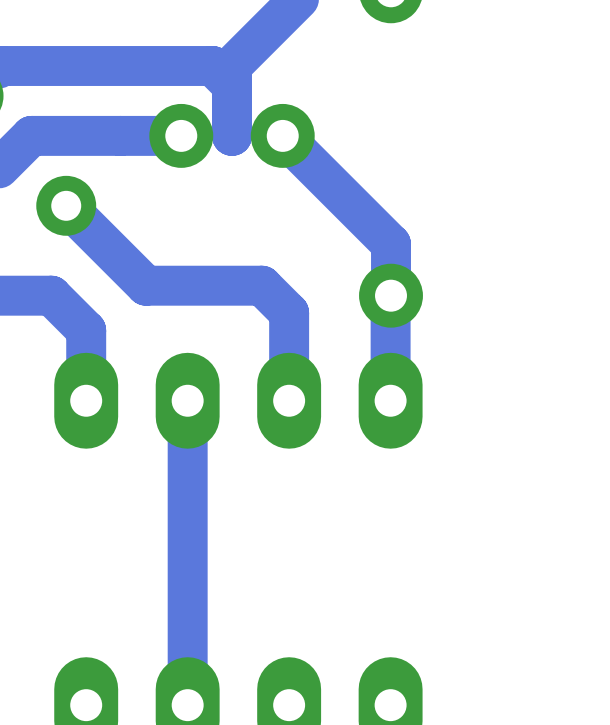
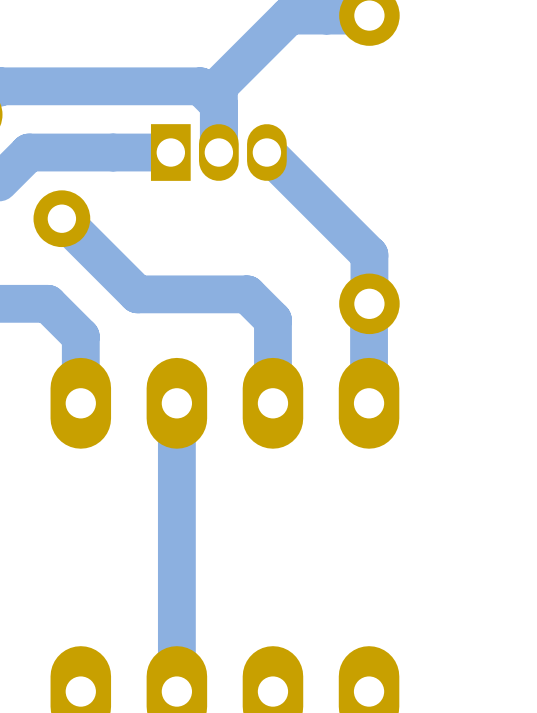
part footprint: [149, 103, 315, 168] -> [150, 124, 287, 181]

